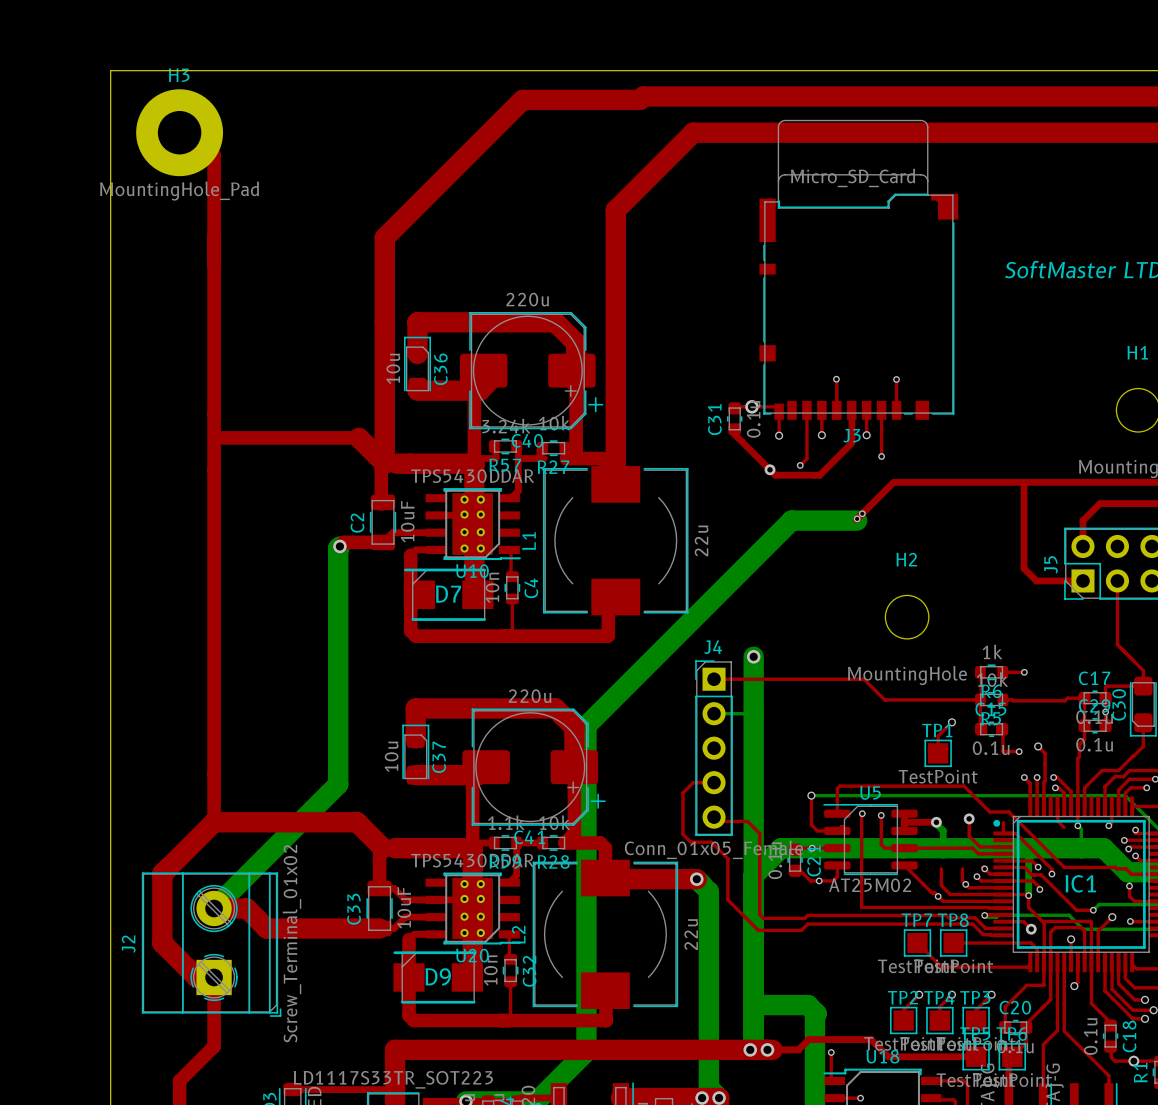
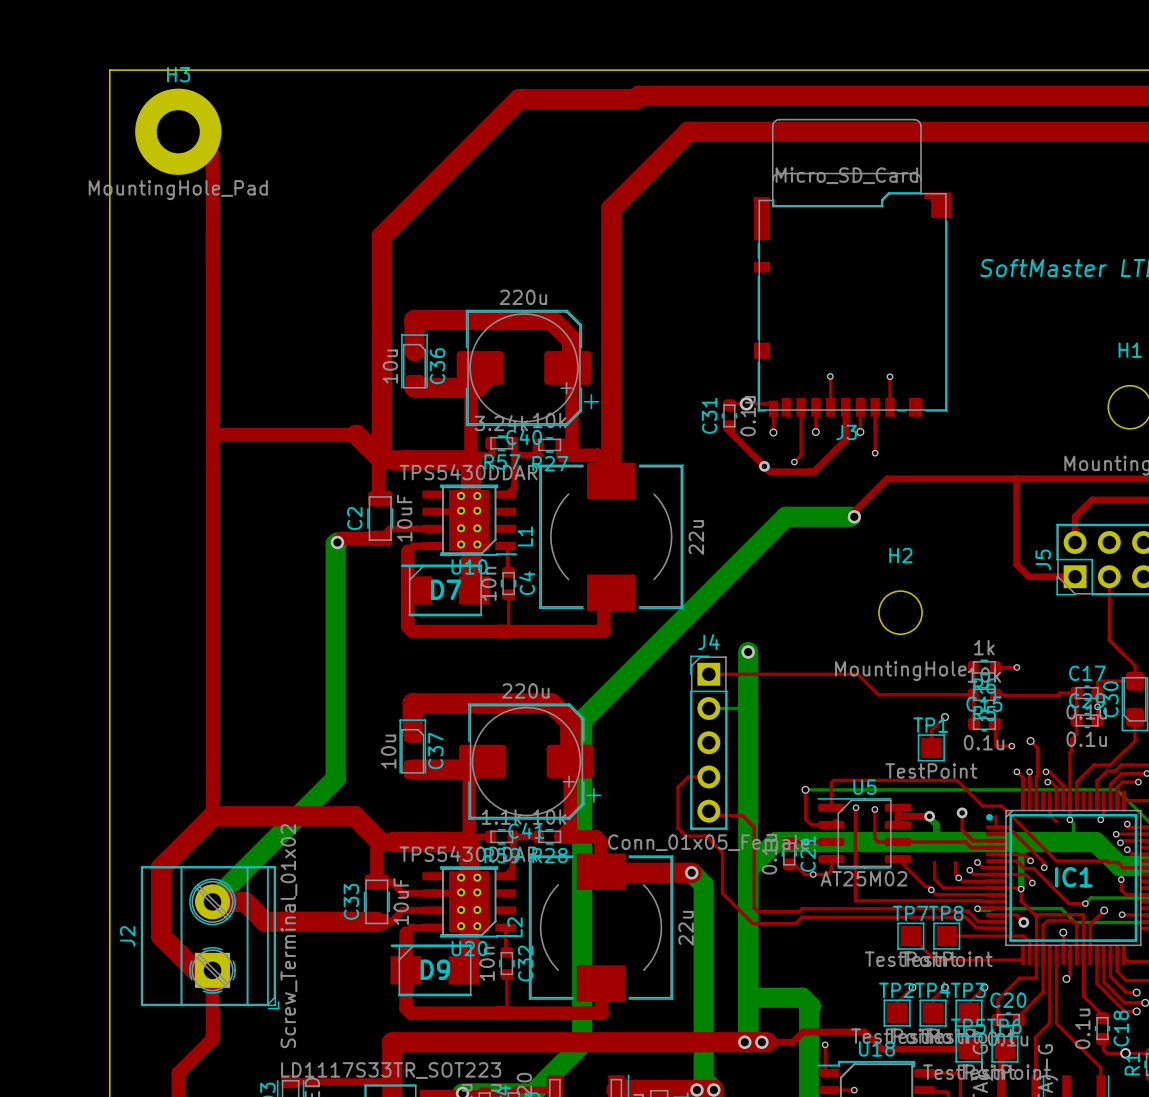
via: (862, 513) -> none
via: (857, 518) -> none
via: none -> (854, 516)

